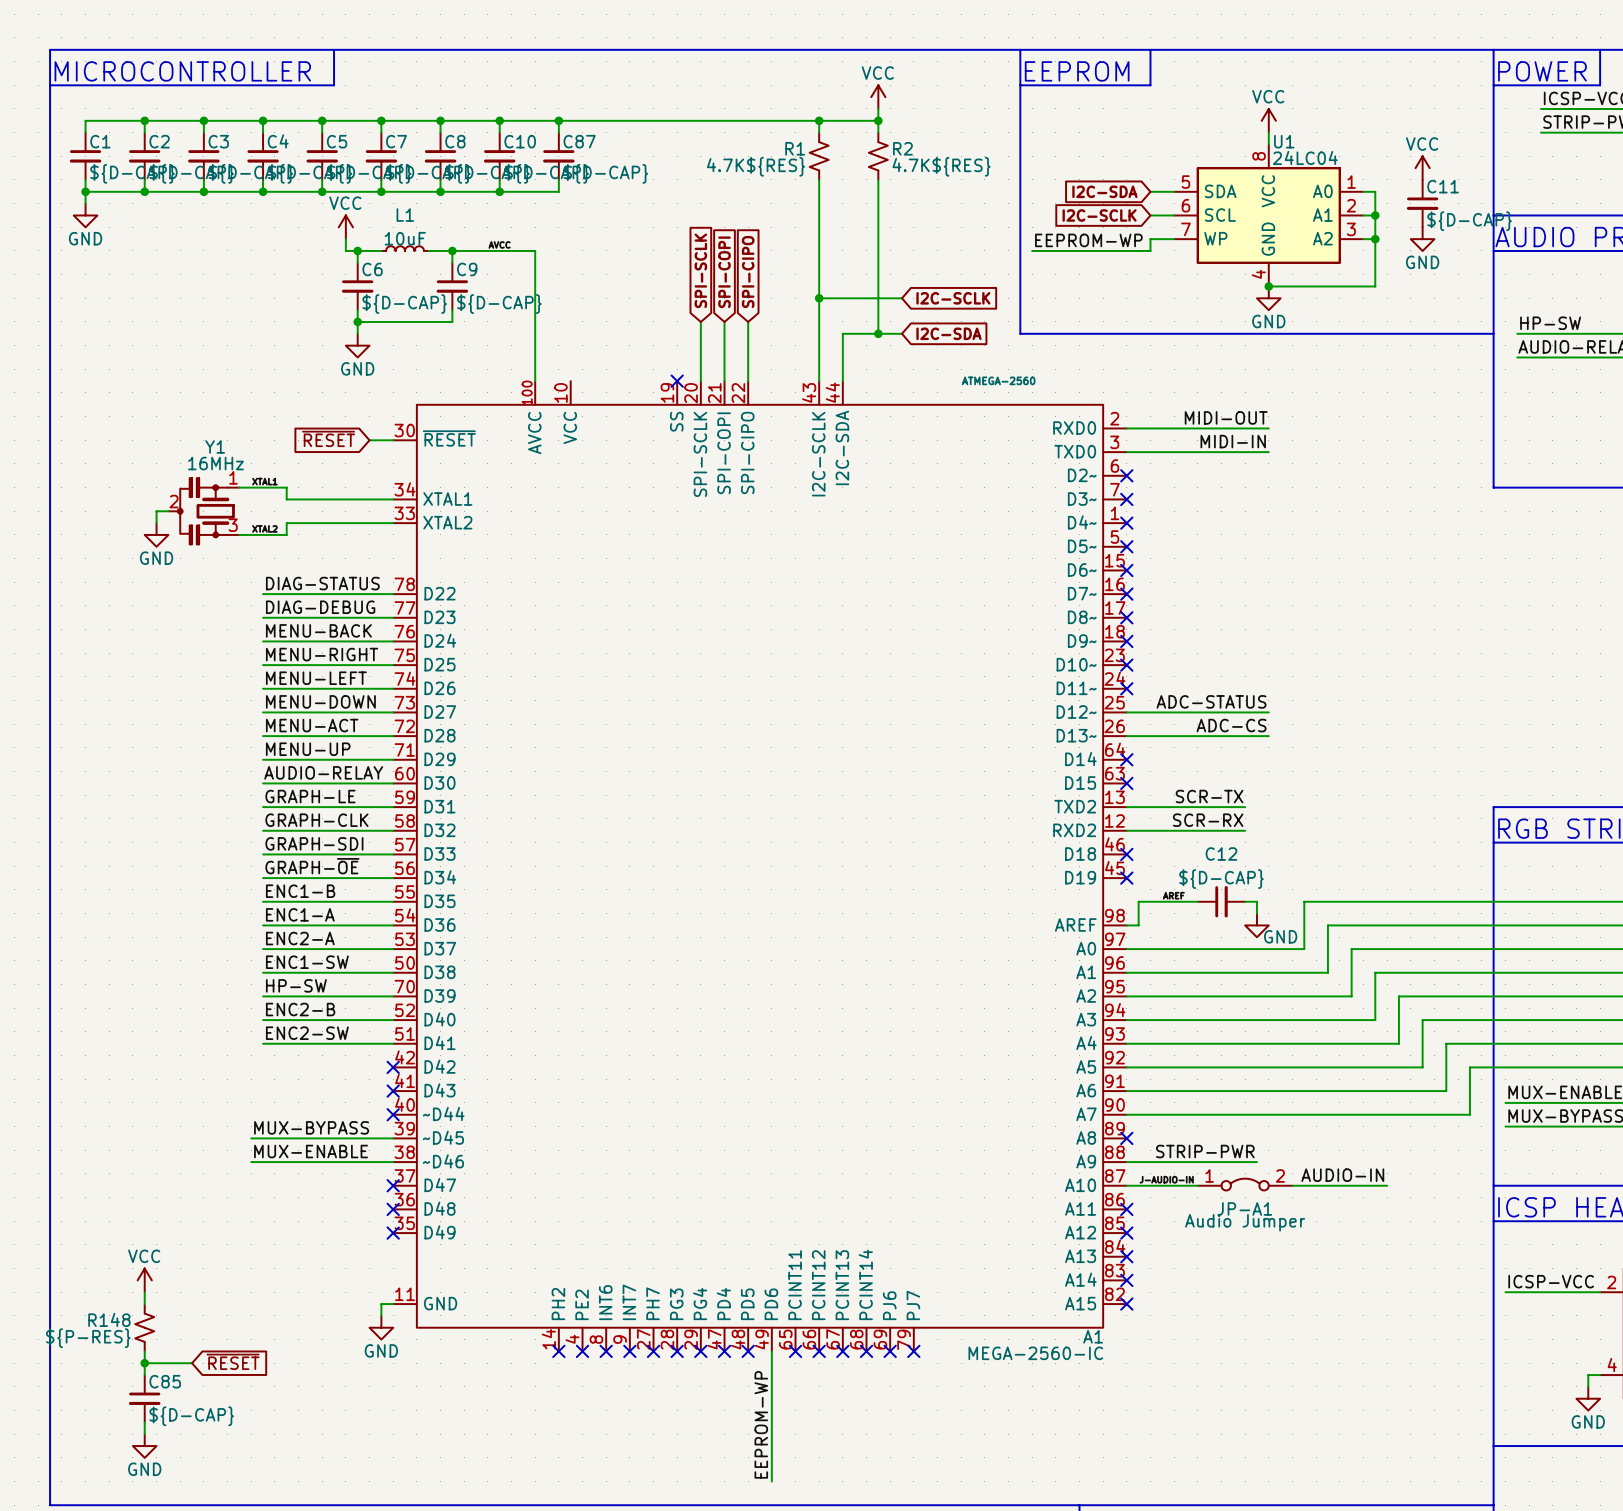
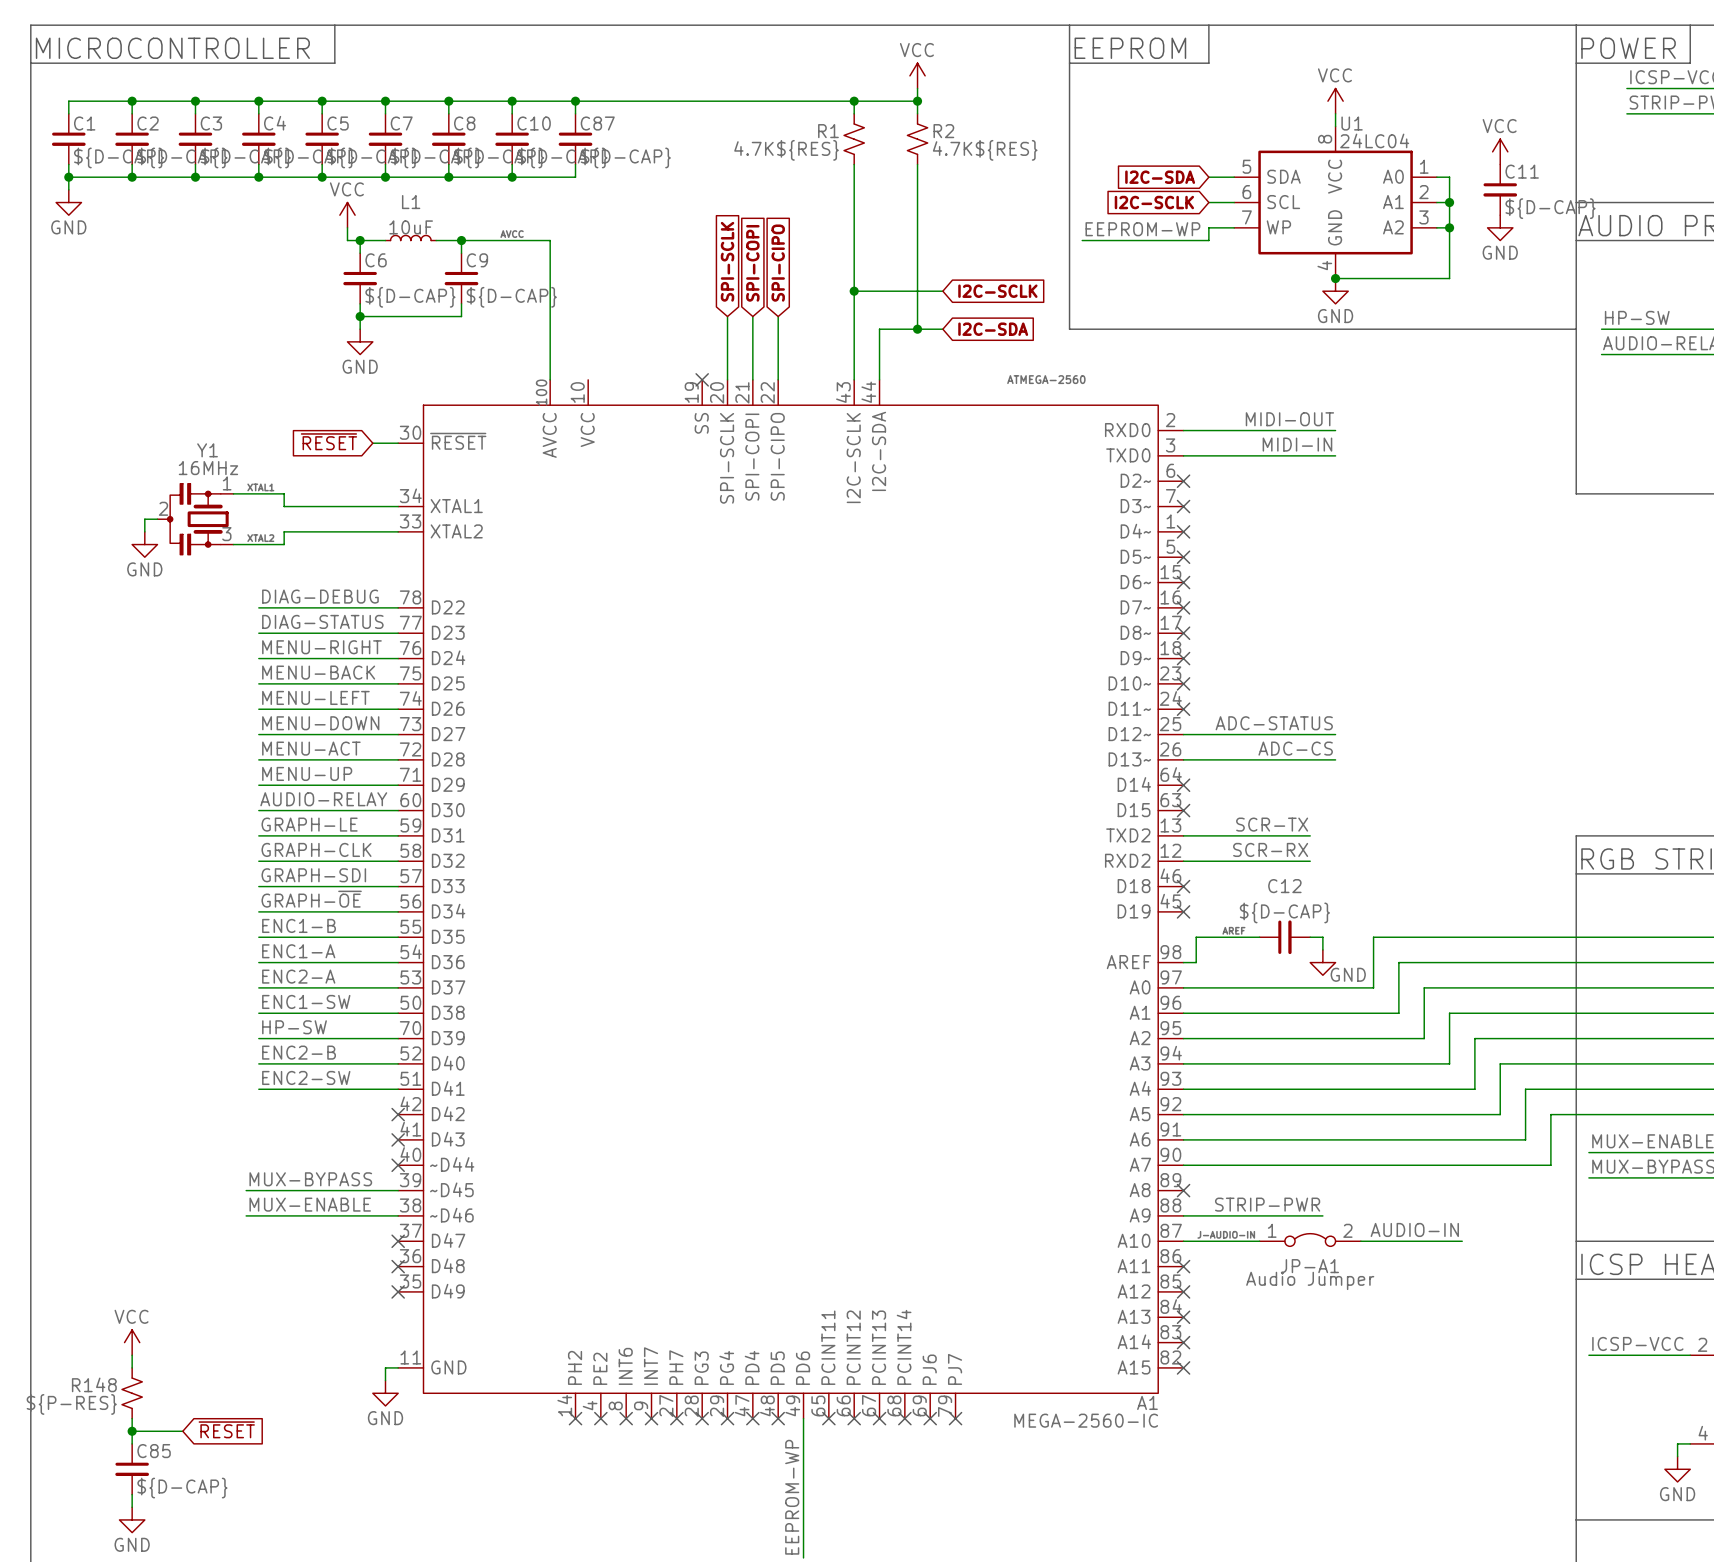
label: DIAG-STATUS (322, 583) -> DIAG-DEBUG (320, 596)
label: DIAG-DEBUG (320, 607) -> DIAG-STATUS (322, 621)
label: MENU-BACK (318, 630) -> MENU-RIGHT (321, 647)
label: MENU-RIGHT (322, 654) -> MENU-BACK (318, 672)

